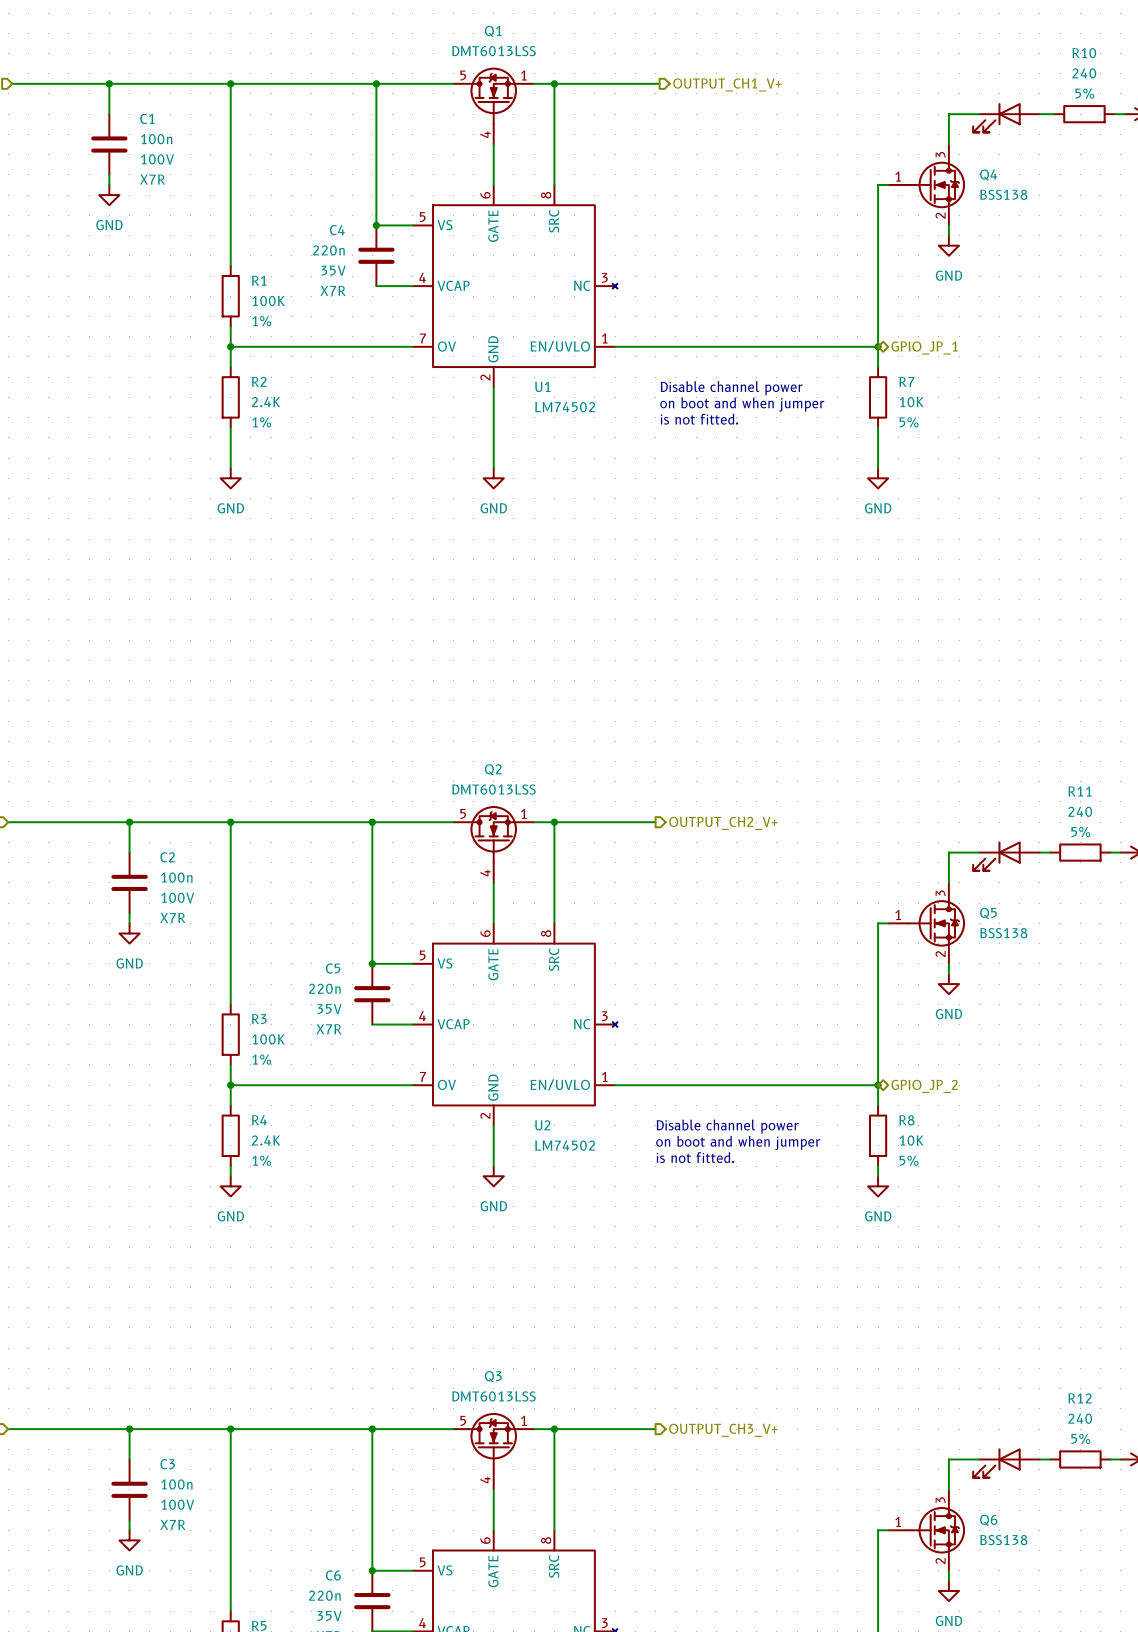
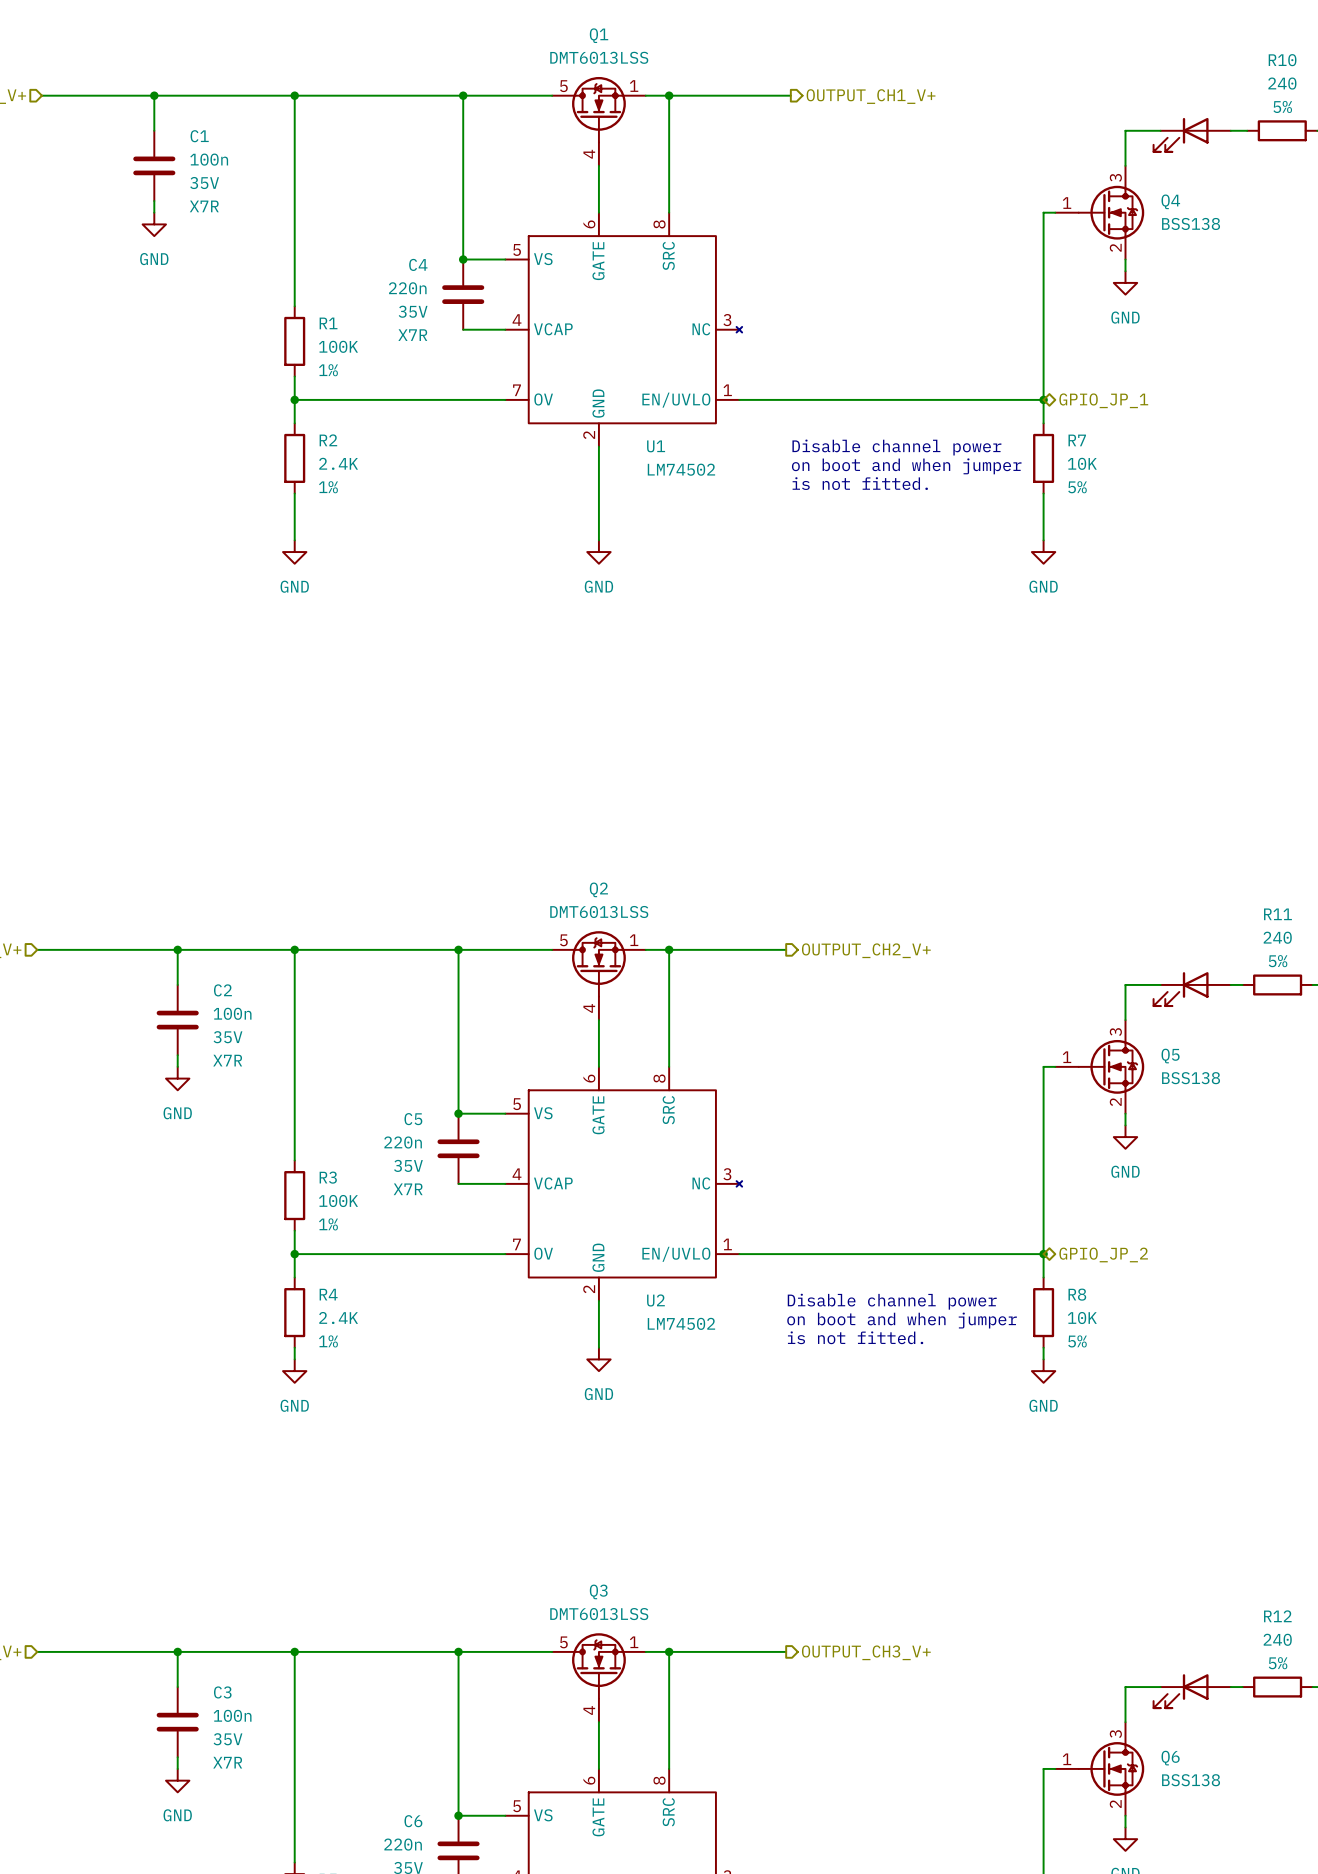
C1 text: 100V (157, 159) -> 35V (204, 183)
C2 text: 100V (177, 897) -> 35V (228, 1037)
C3 text: 100V (177, 1504) -> 35V (228, 1739)

